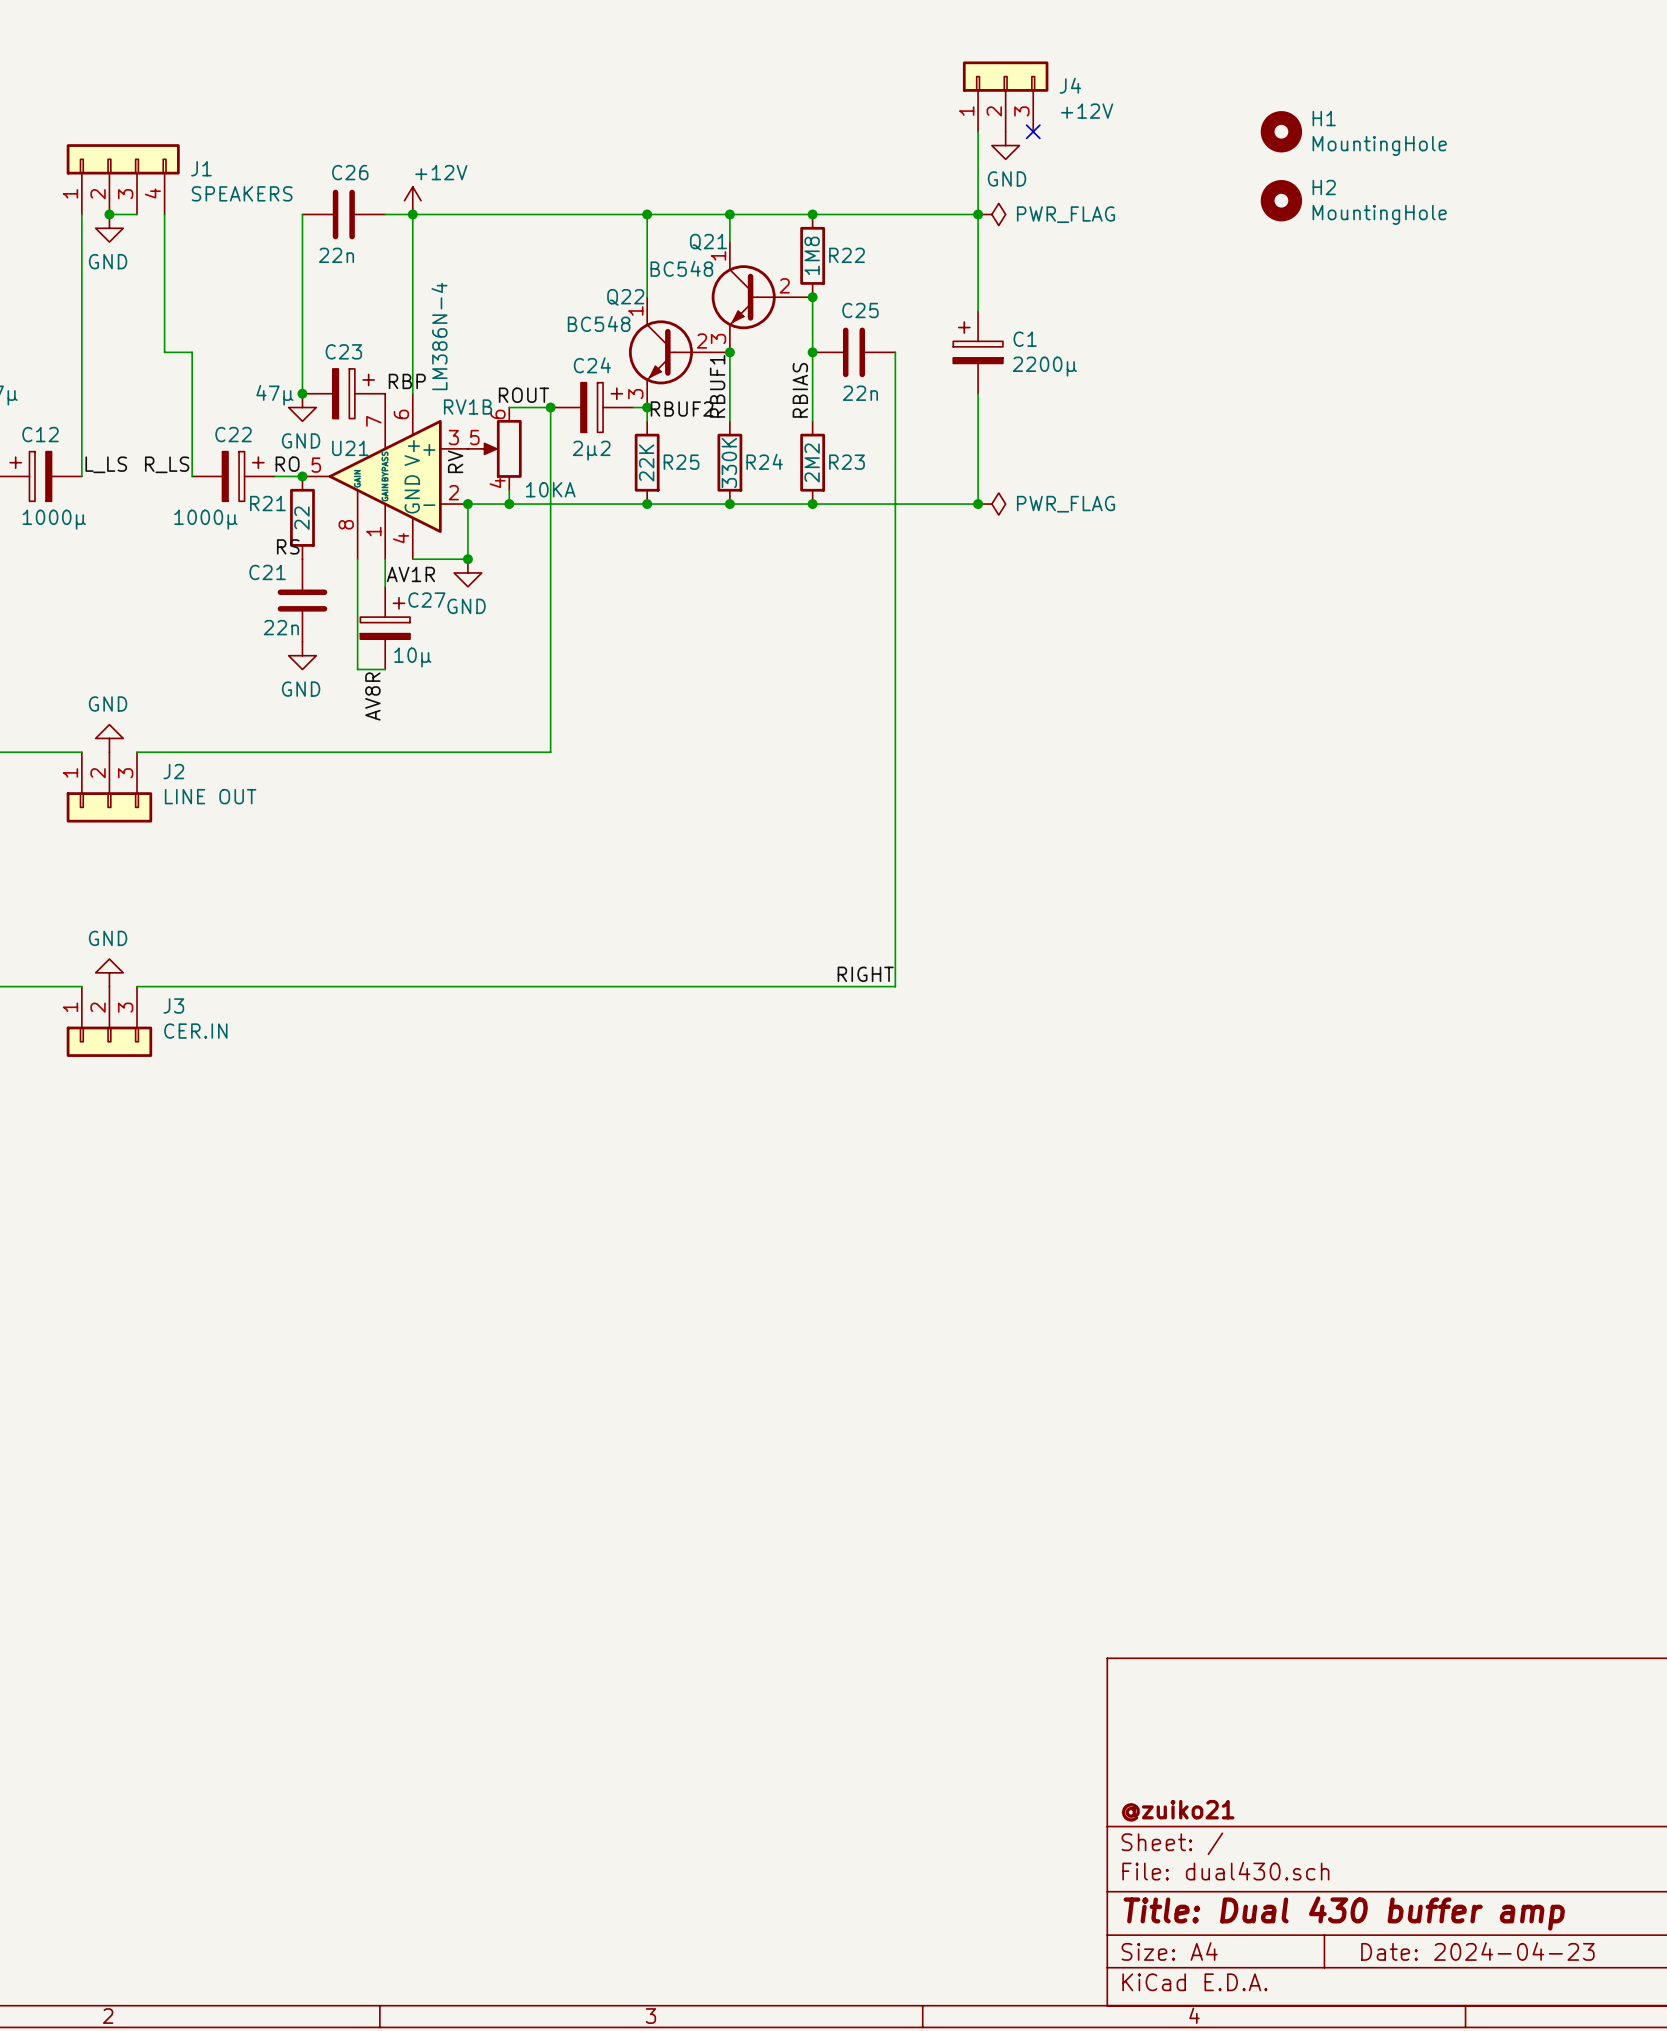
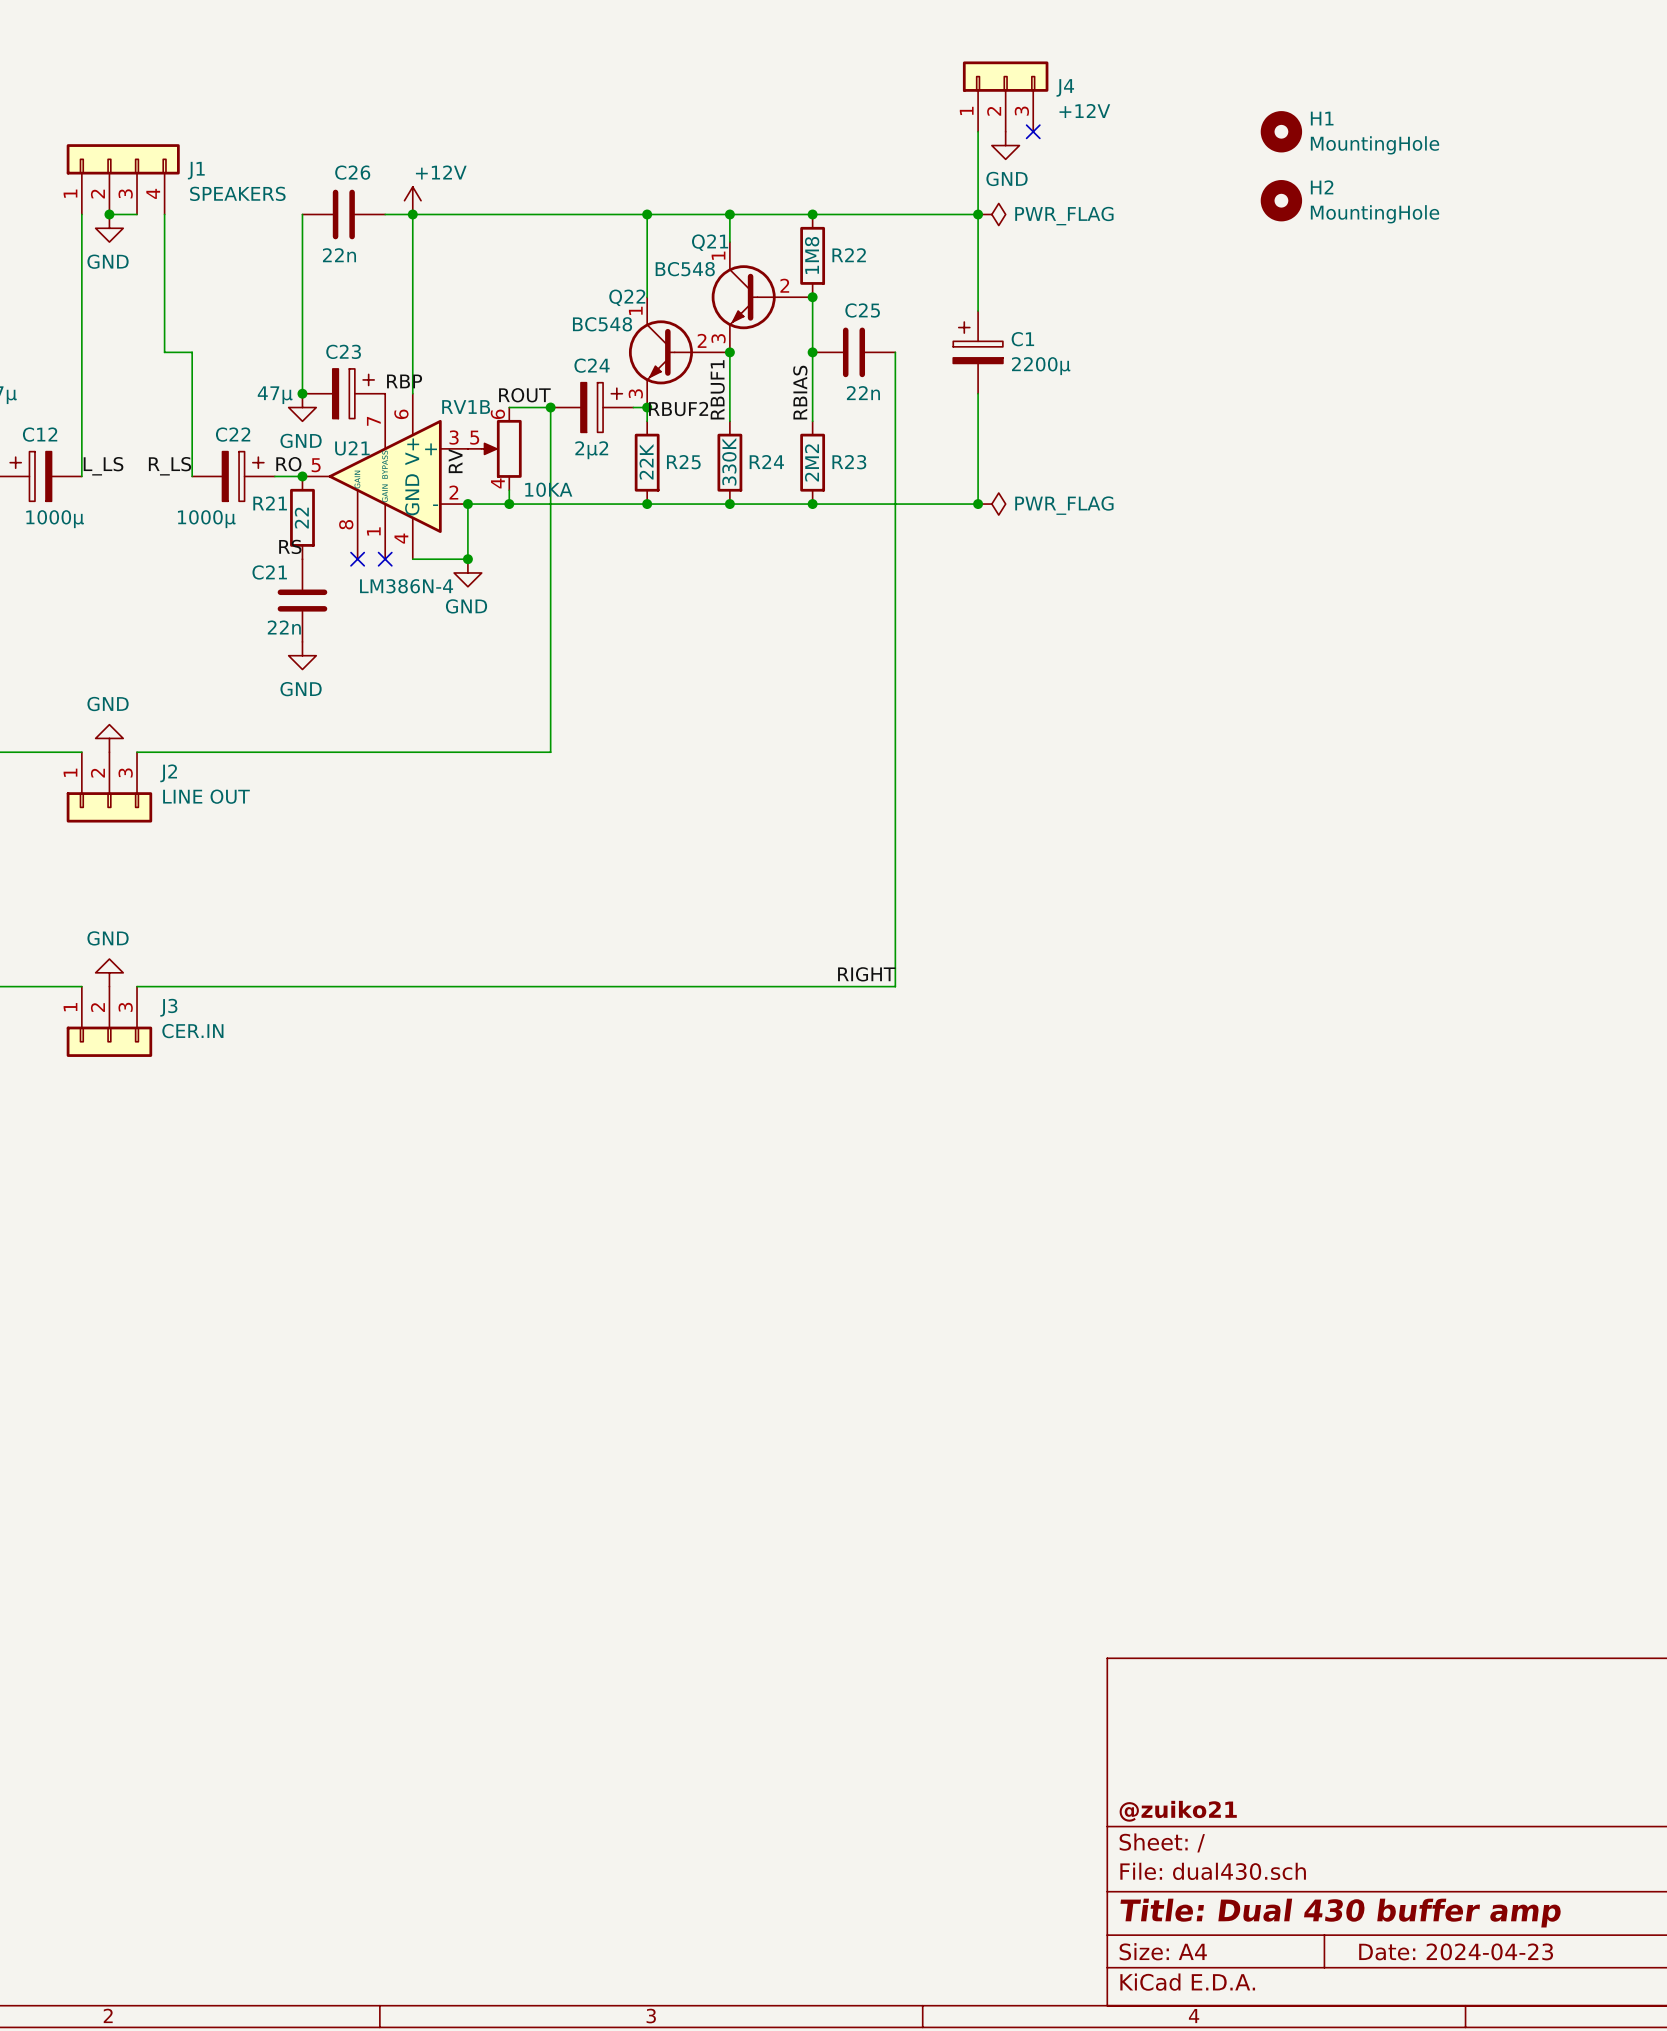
U21 value rotation: 0° (439, 336) -> 90° clockwise (406, 586)
U21 value position: LM386N-4 (439, 336) -> LM386N-4 (406, 586)
wire: (357, 559) (357, 669) (385, 669) -> none
no-connect mark: none -> (357, 559)
wire: (385, 559) (385, 586) -> none
no-connect mark: none -> (385, 559)
label: AV1R (410, 574) -> none
C27: 10µ (385, 628) -> none
label: AV8R (372, 696) -> none

